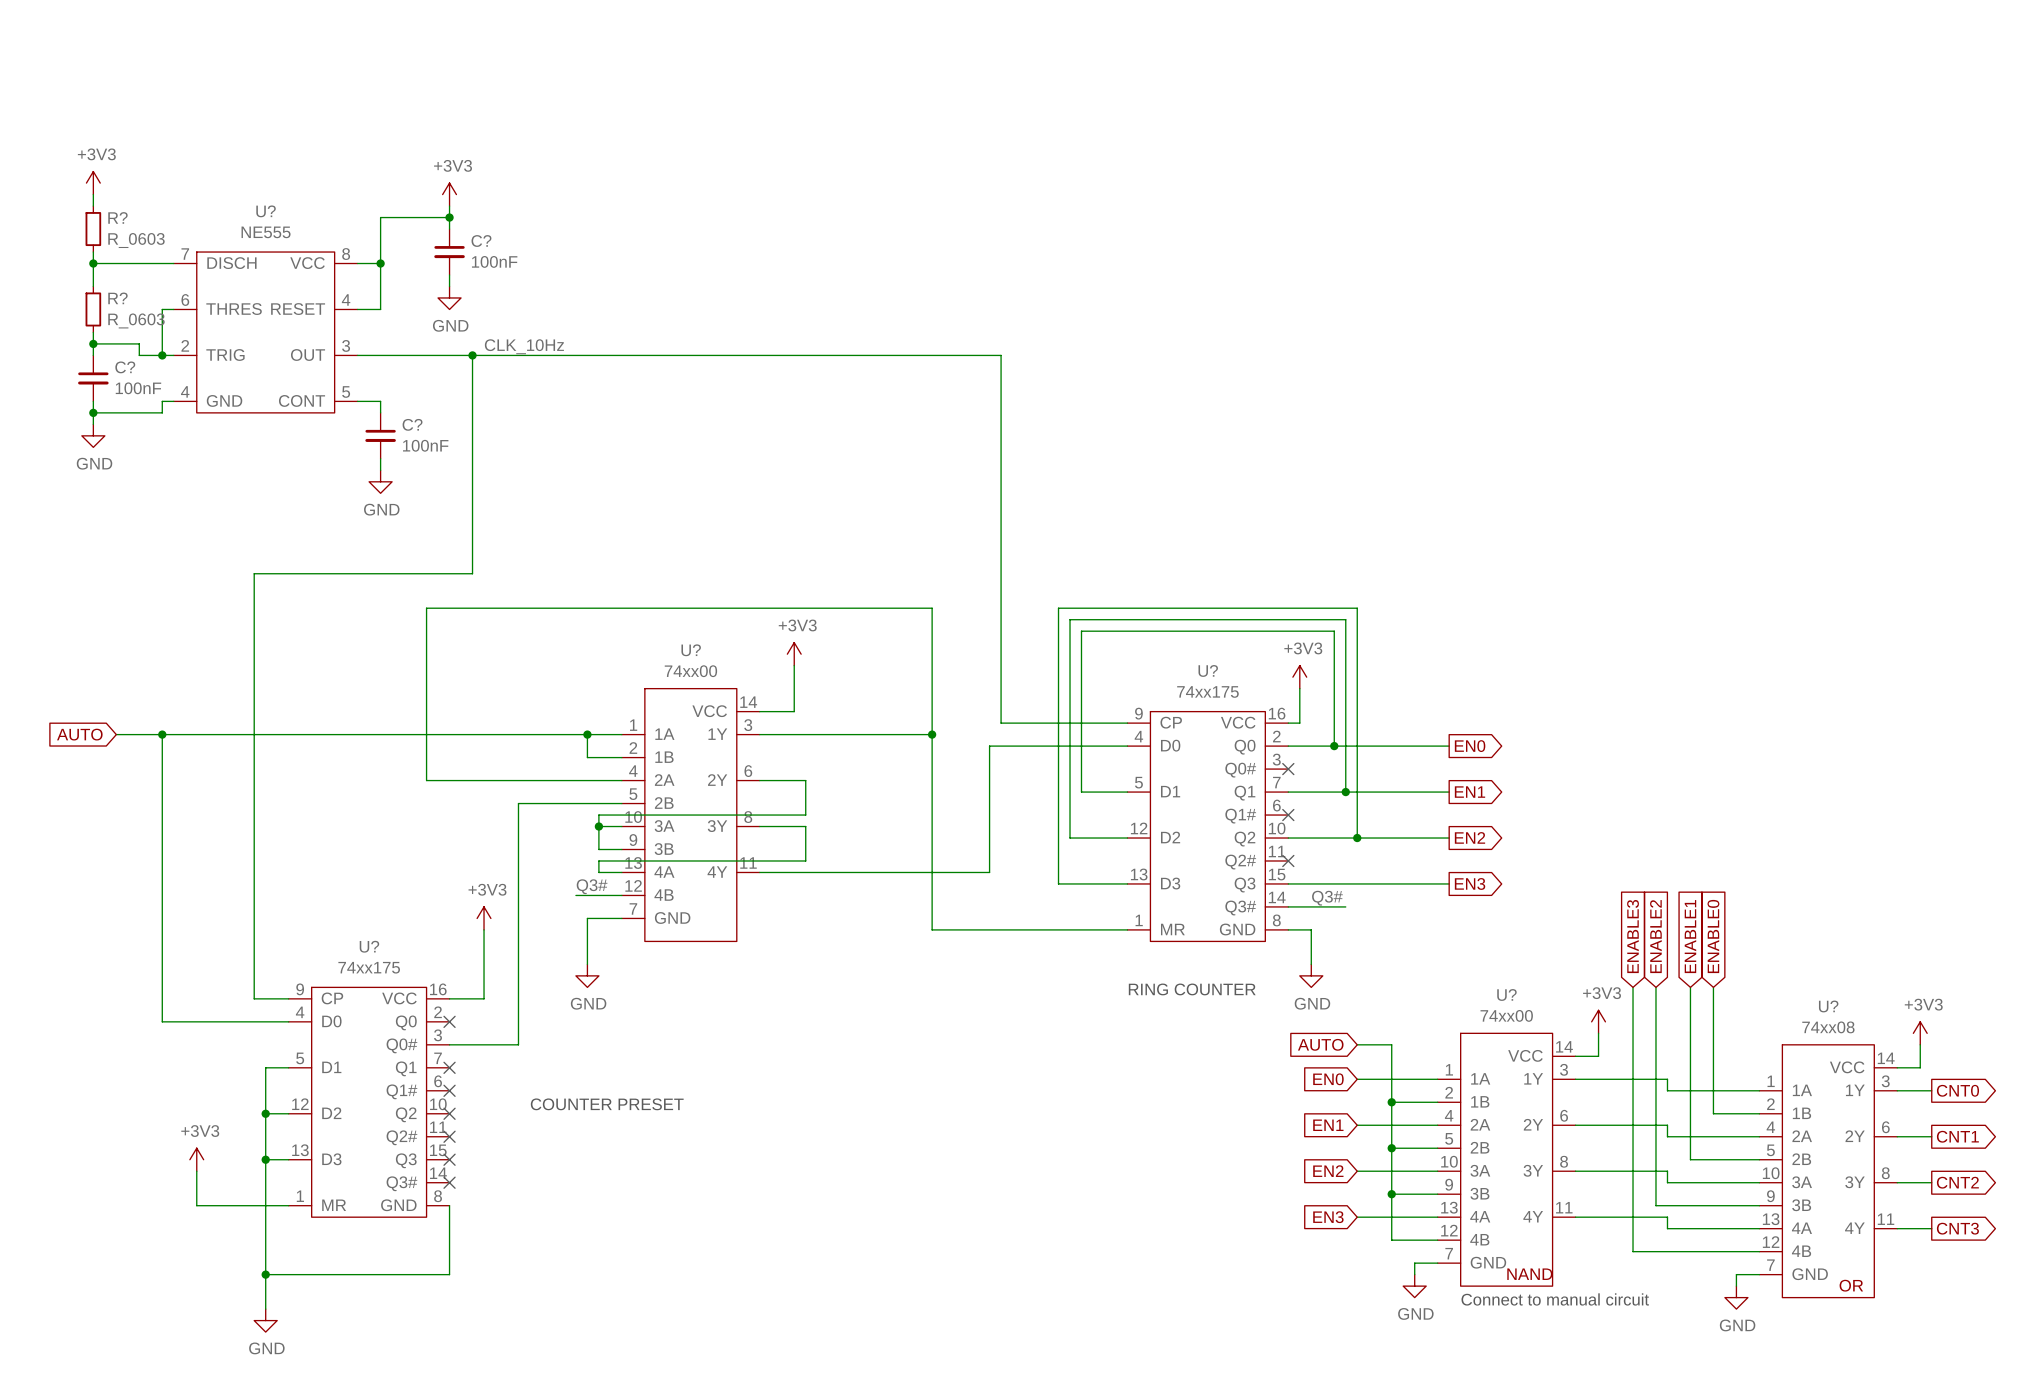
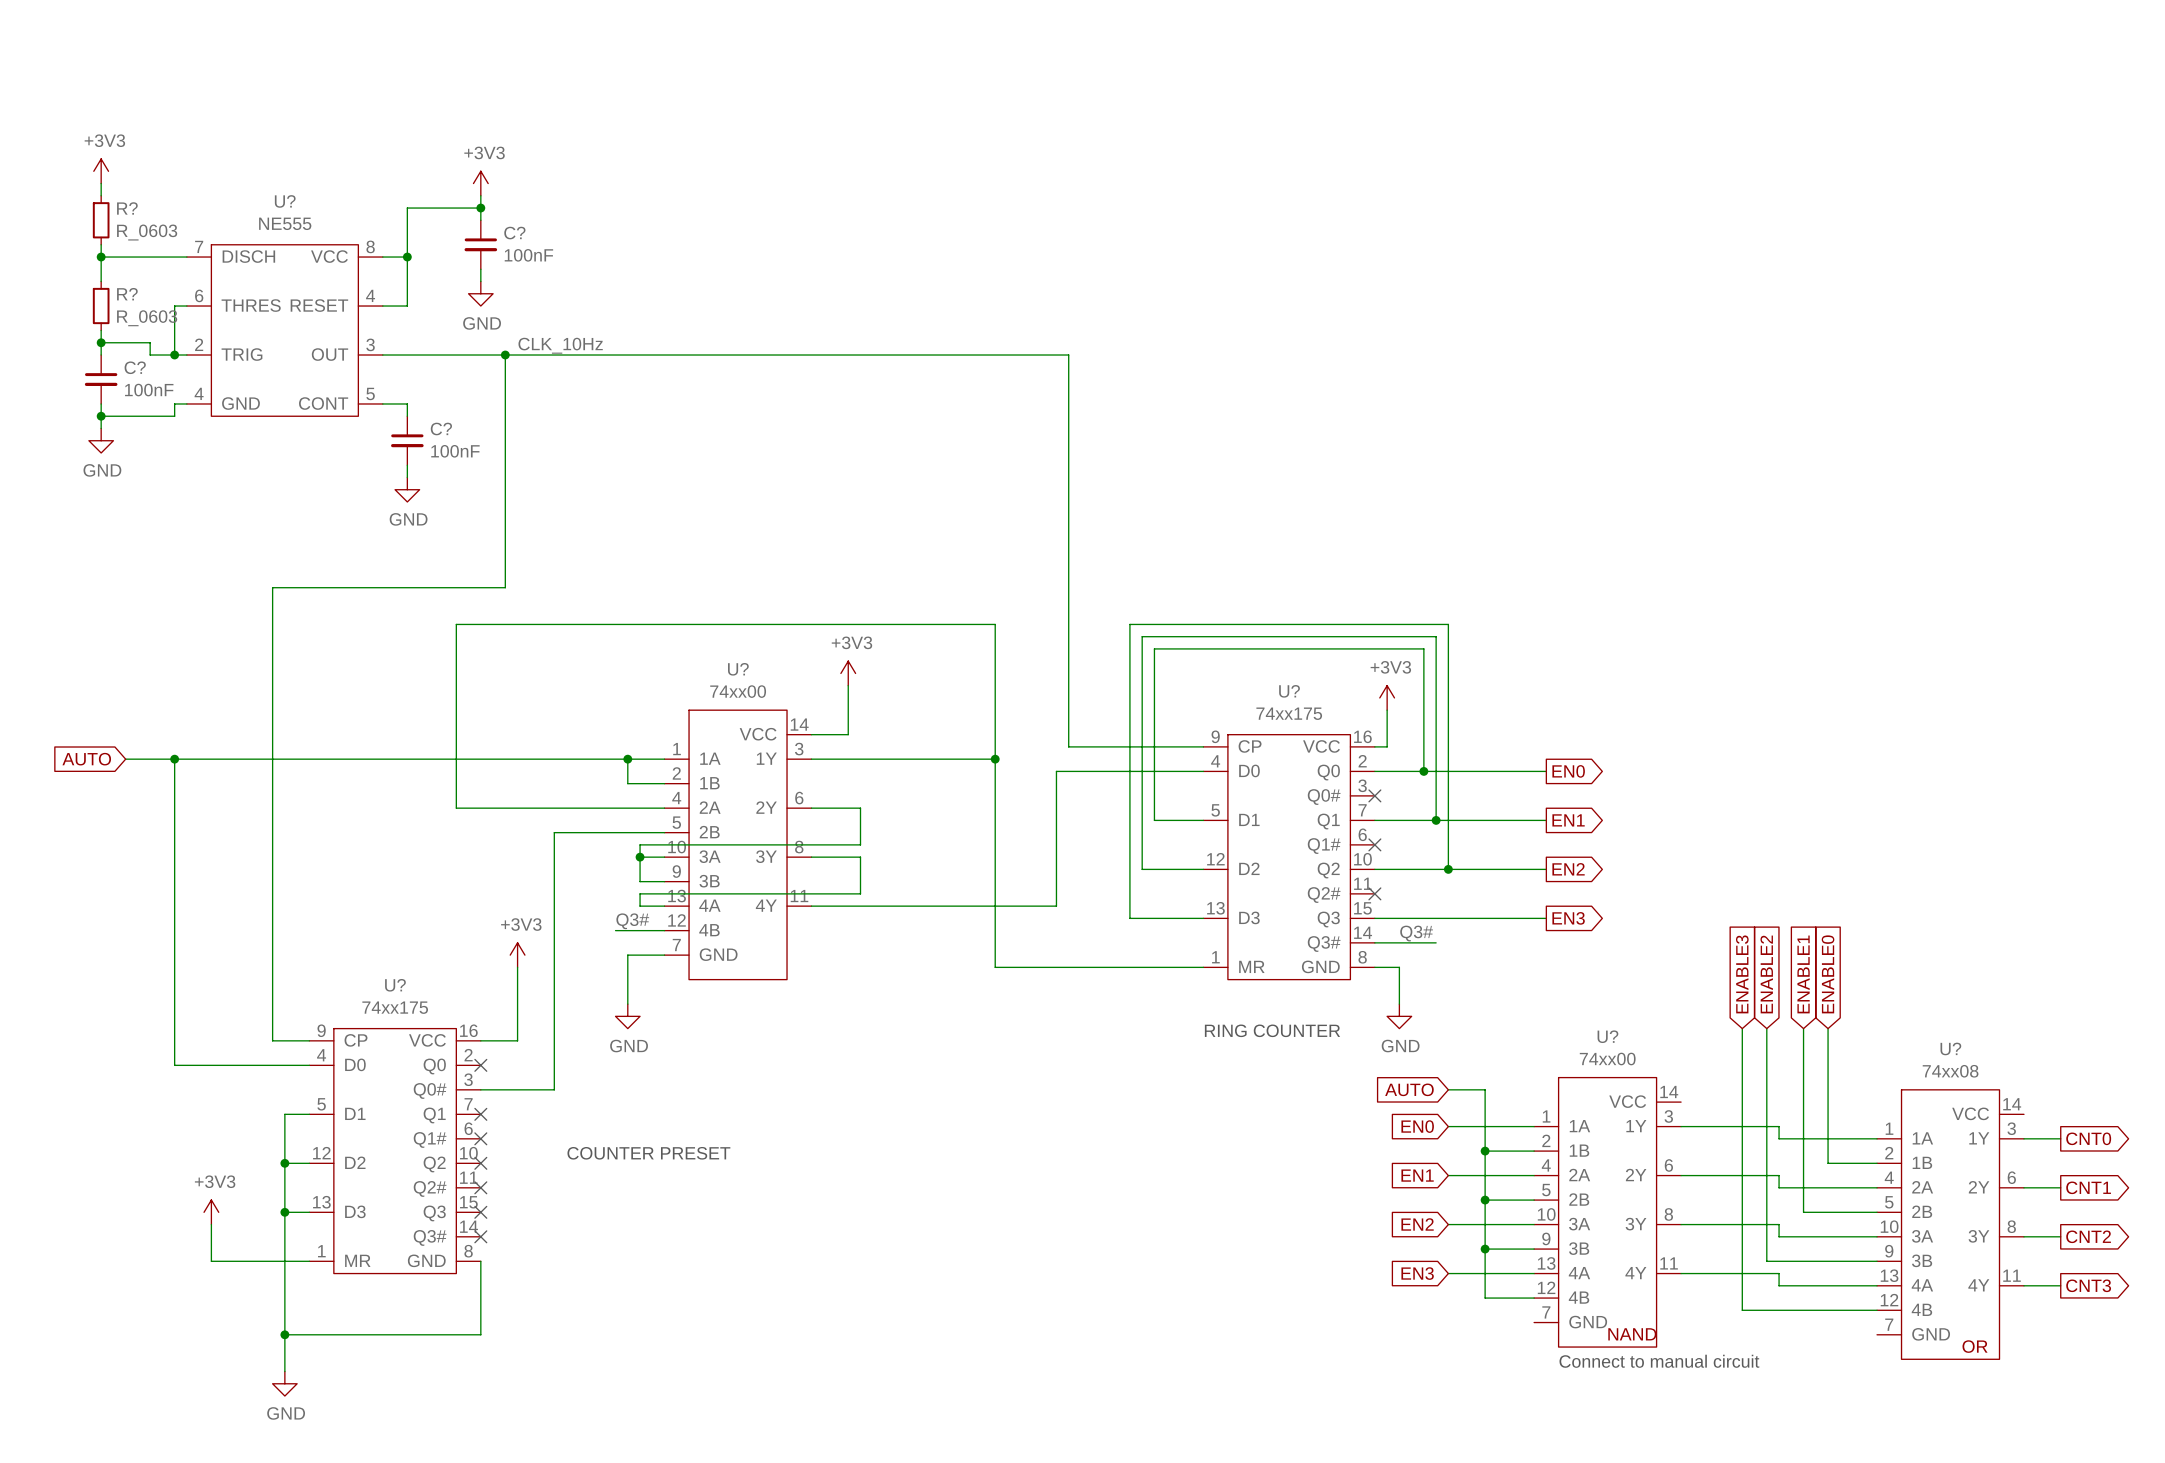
power symbol: +3V3 (1598, 1021) -> none
wire: (1598, 1033) (1598, 1056) (1575, 1056) -> none
power symbol: +3V3 (1920, 1033) -> none
wire: (1920, 1044) (1920, 1067) (1897, 1067) -> none
wire: (1437, 1263) (1414, 1263) (1414, 1274) -> none
wire: (1759, 1274) (1736, 1274) (1736, 1286) -> none
power symbol: GND (1414, 1286) -> none
power symbol: GND (1736, 1297) -> none

